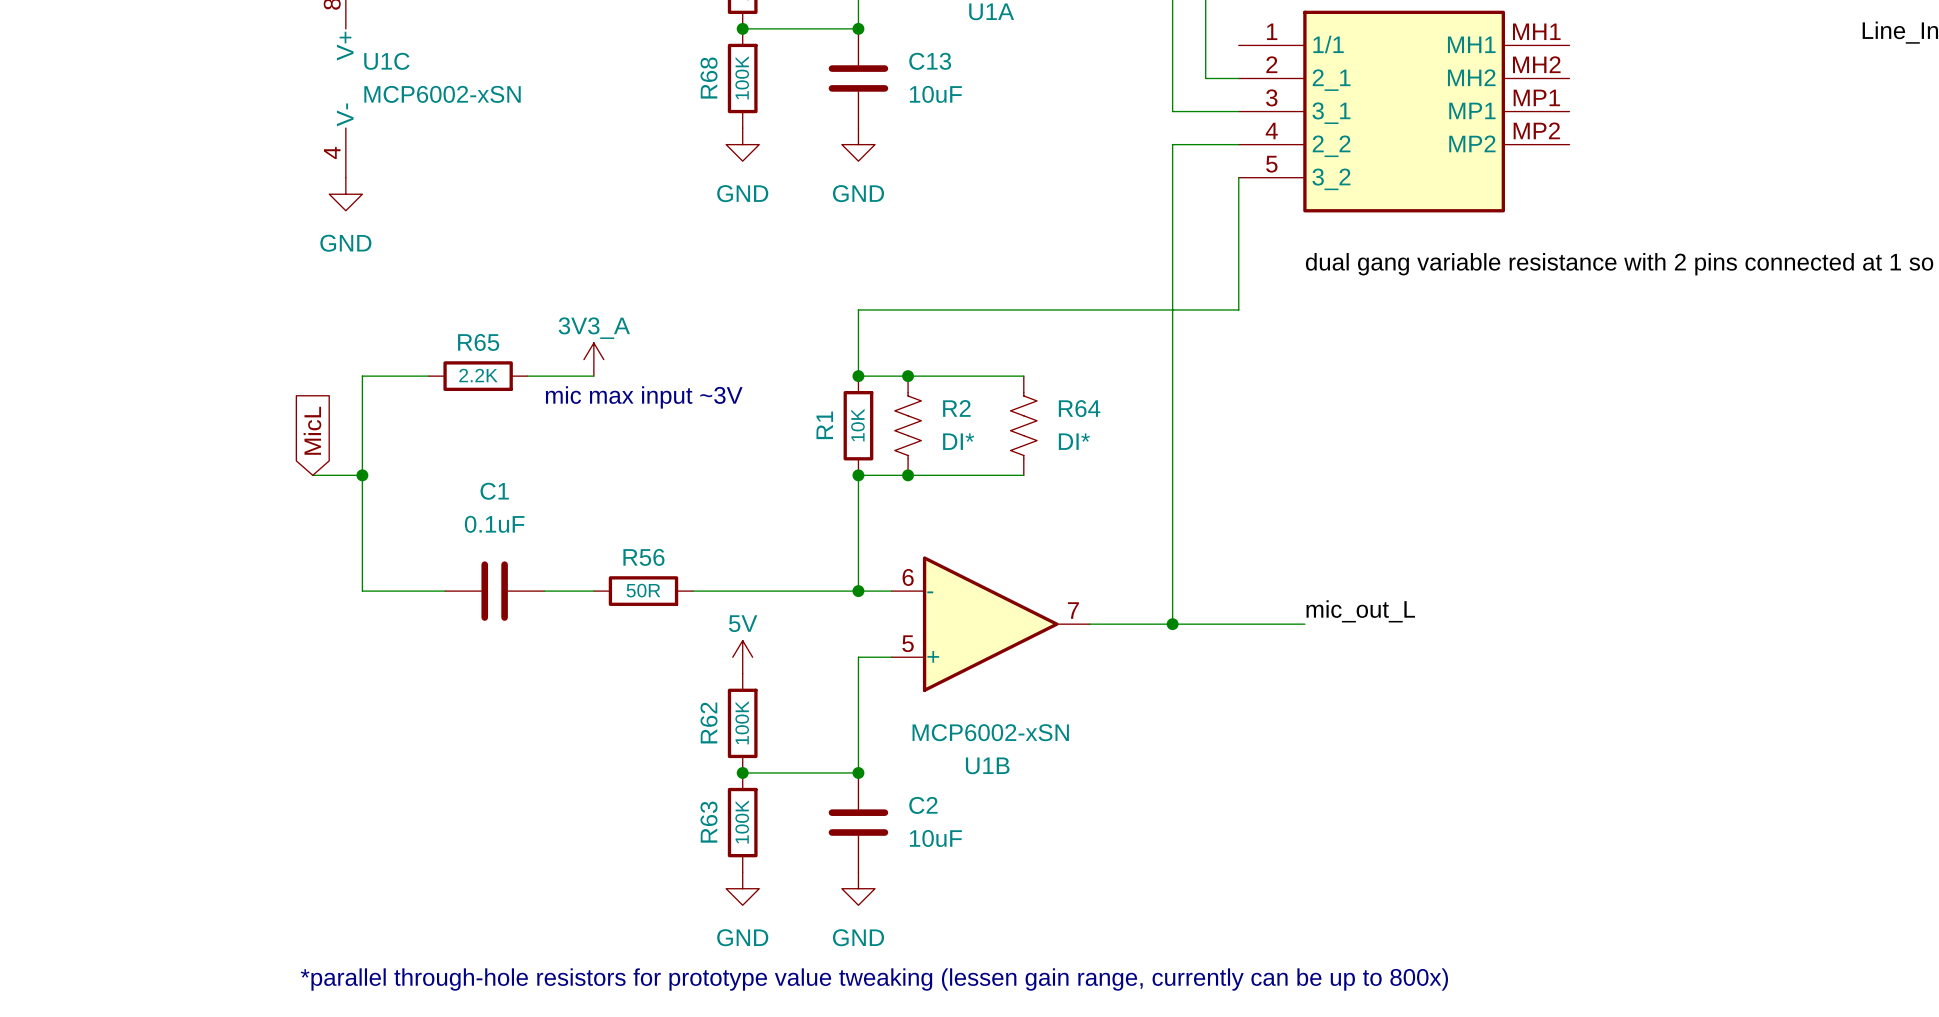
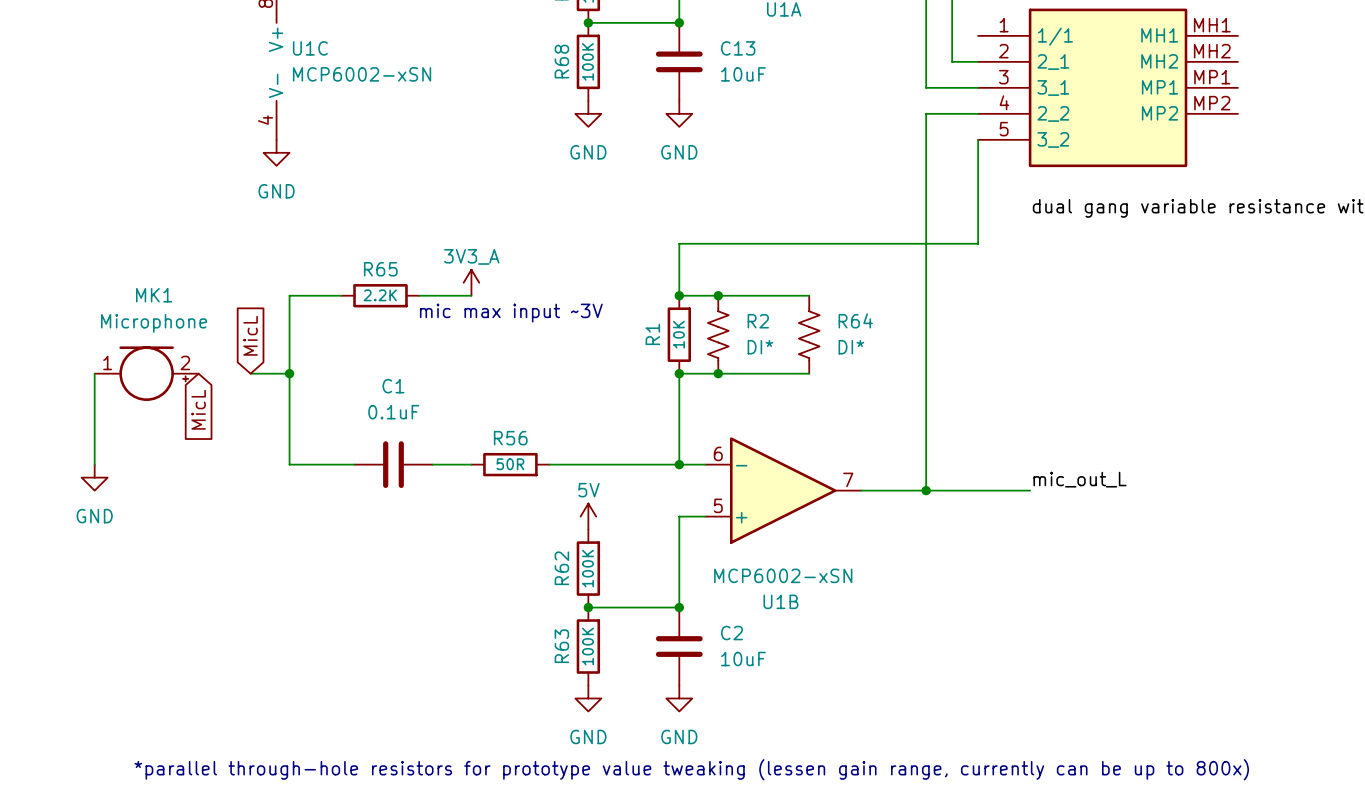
wire: none -> (94, 373) (94, 464)
MK1: none -> Microphone (146, 373)
global label: none -> MicL (198, 409)
power symbol: none -> GND (94, 477)

